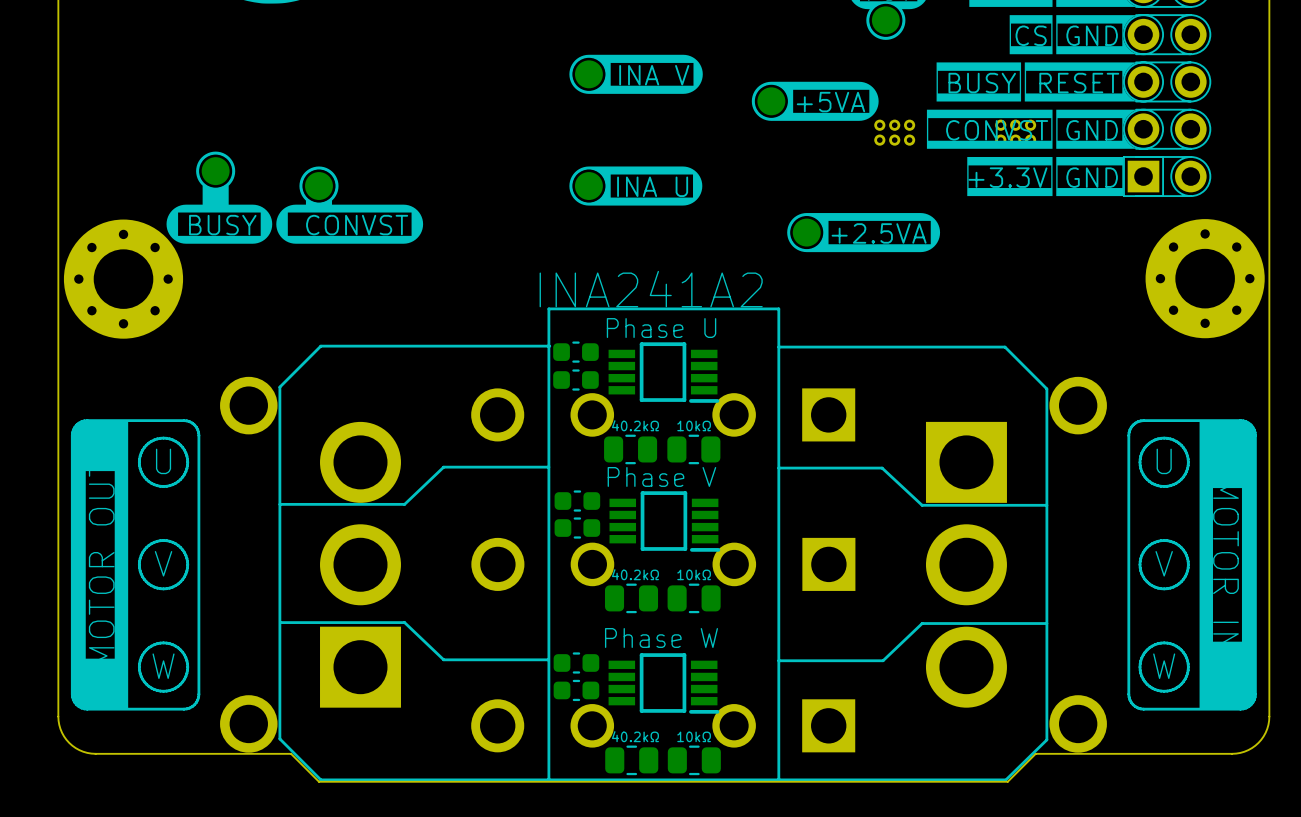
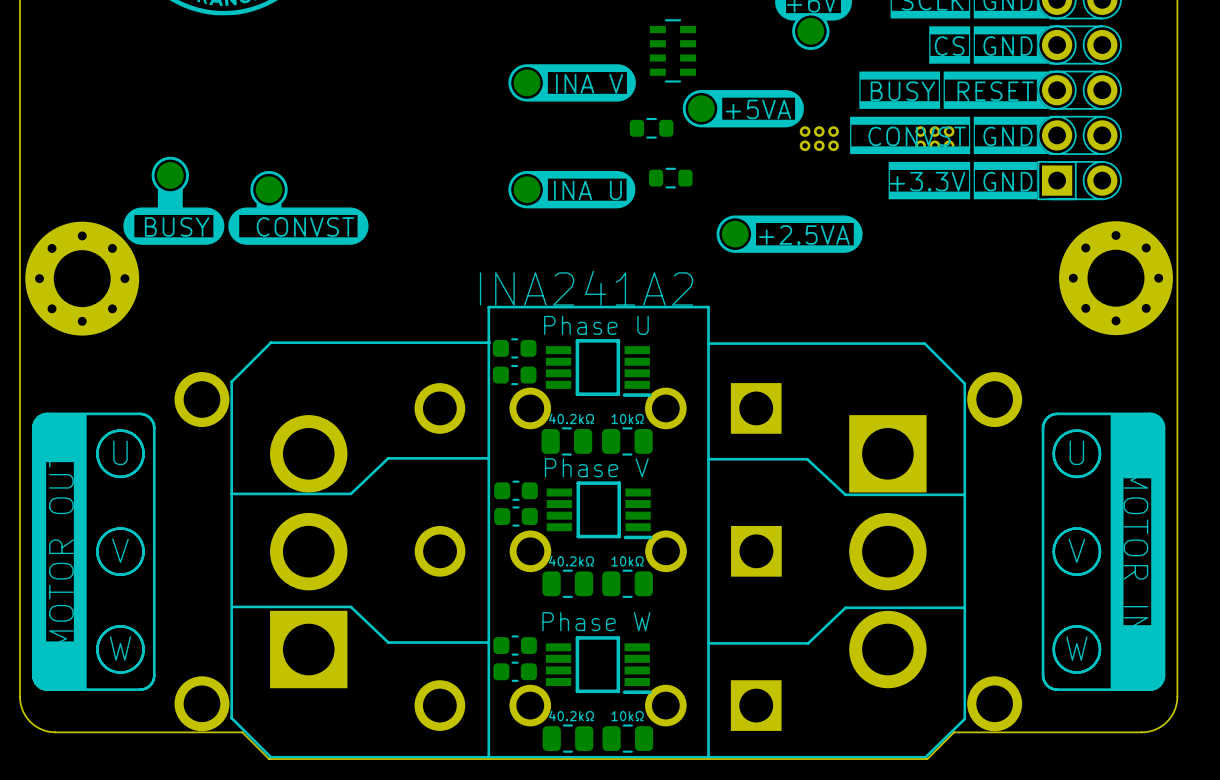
part: none -> (672, 50)
part: none -> (651, 128)
part: none -> (670, 178)

